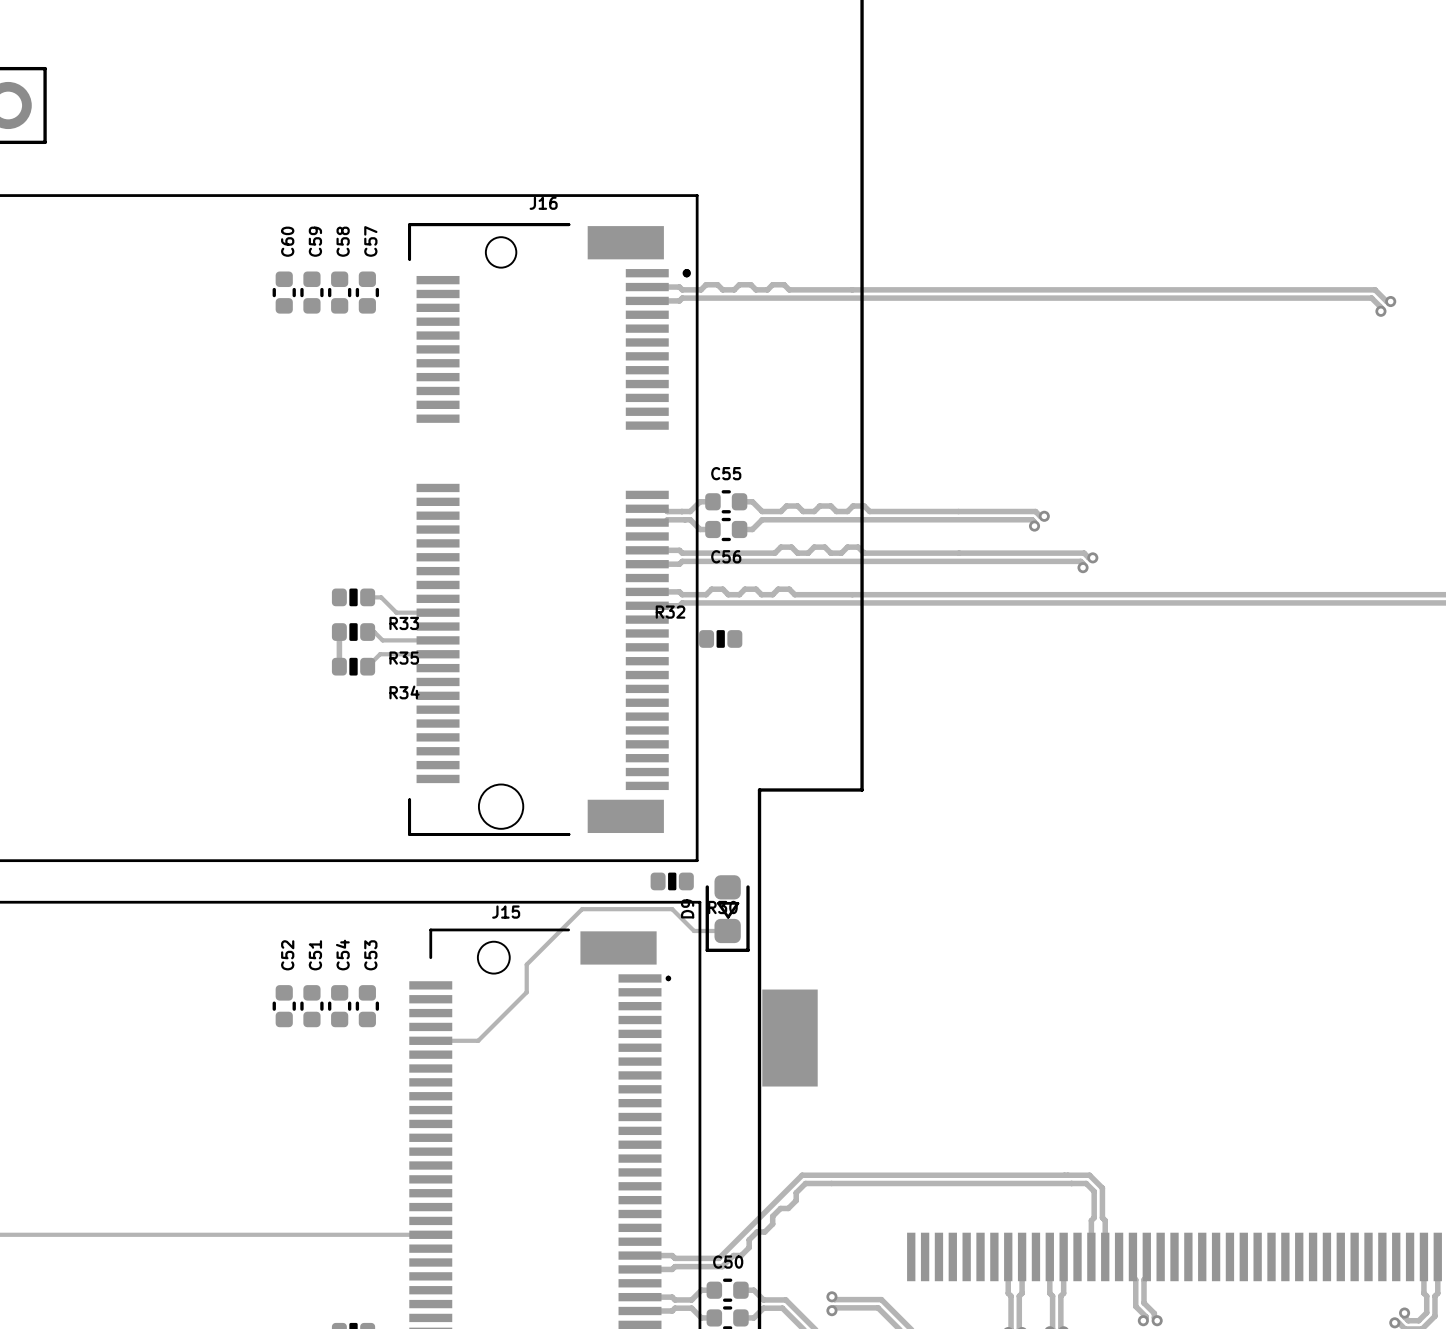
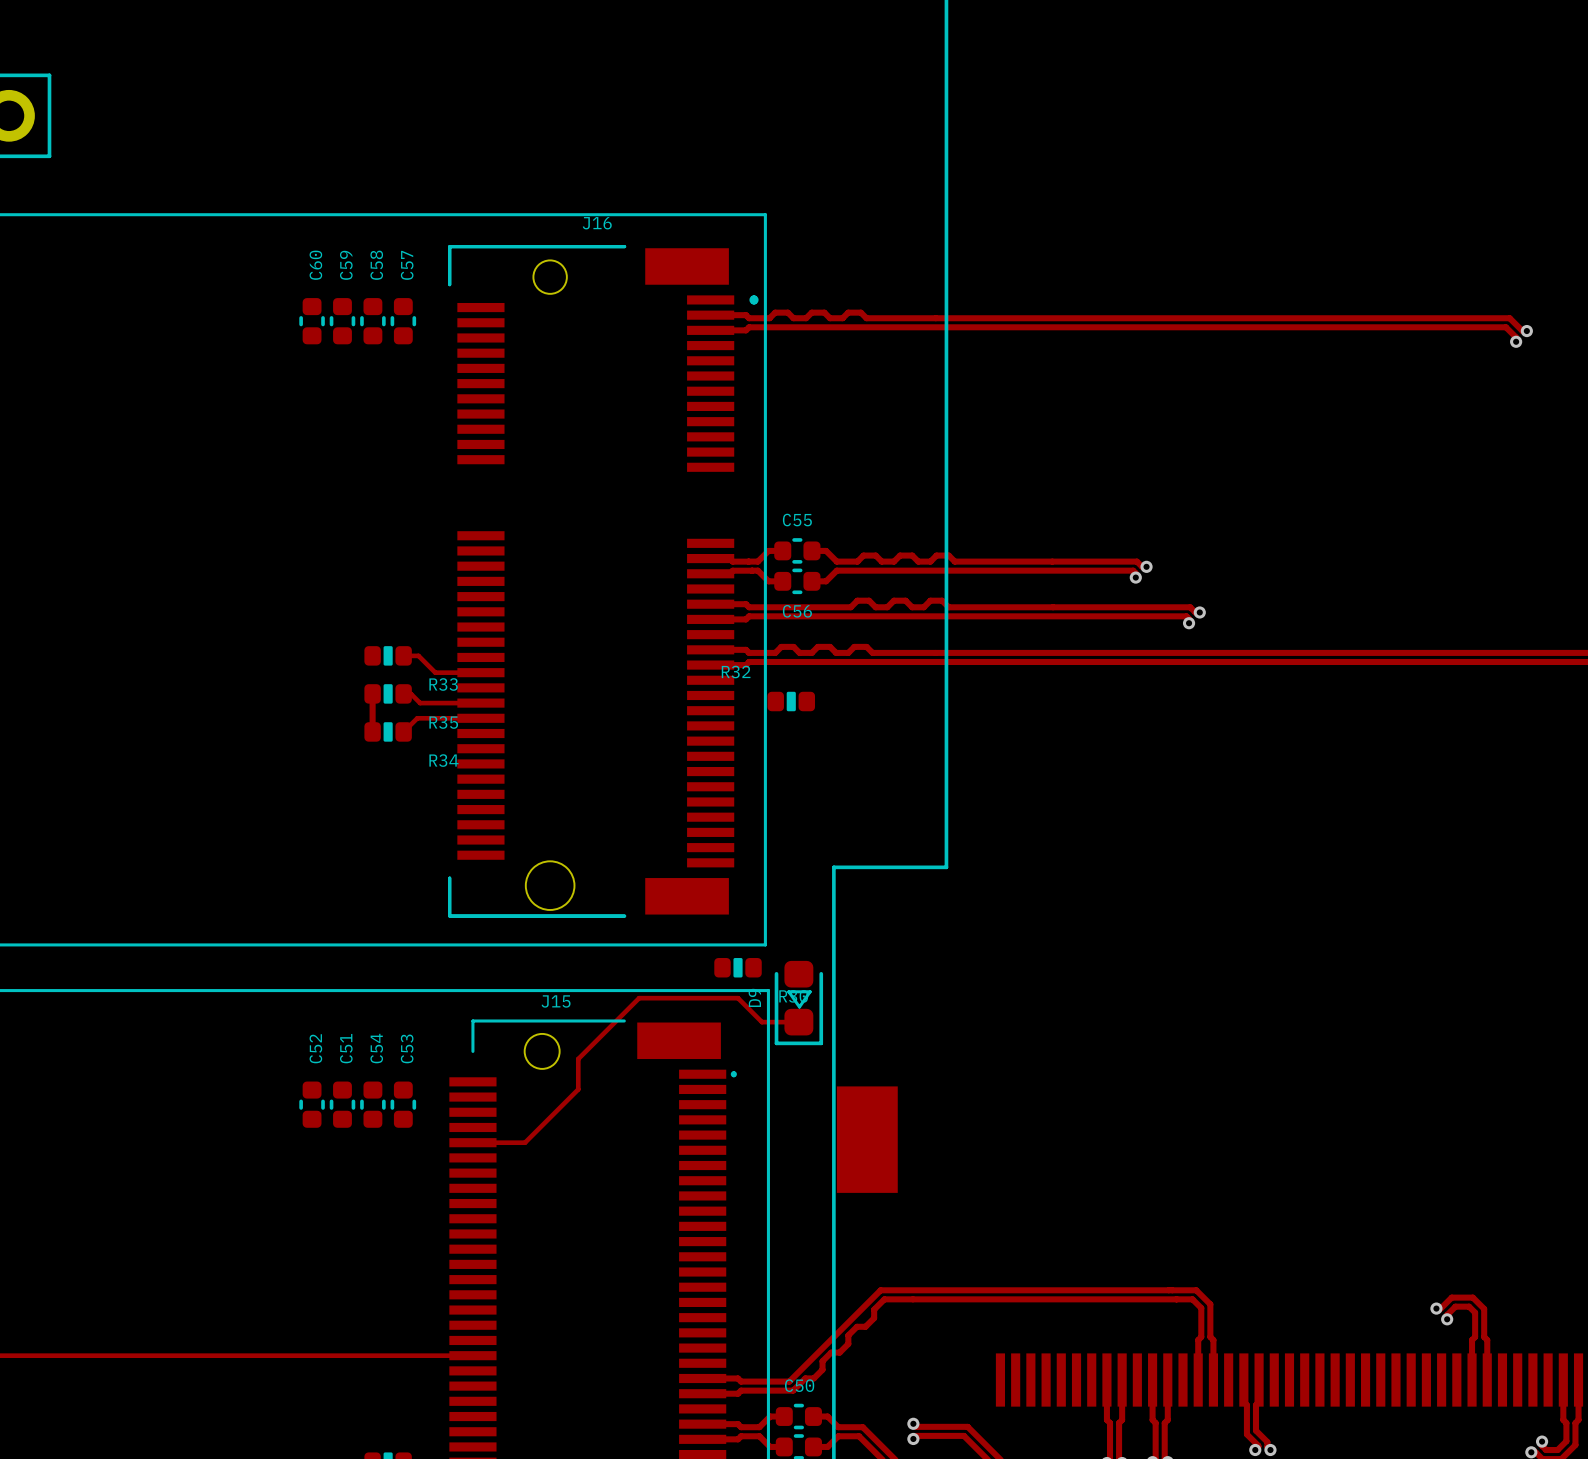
track: none -> (1436, 1308) (1440, 1308) (1451, 1297) (1472, 1297) (1484, 1308) (1484, 1337) (1487, 1340) (1487, 1380)
via: none -> (1436, 1308)
track: none -> (1447, 1319) (1447, 1314) (1455, 1306) (1469, 1306) (1475, 1312) (1475, 1337) (1472, 1340) (1472, 1380)
via: none -> (1447, 1319)

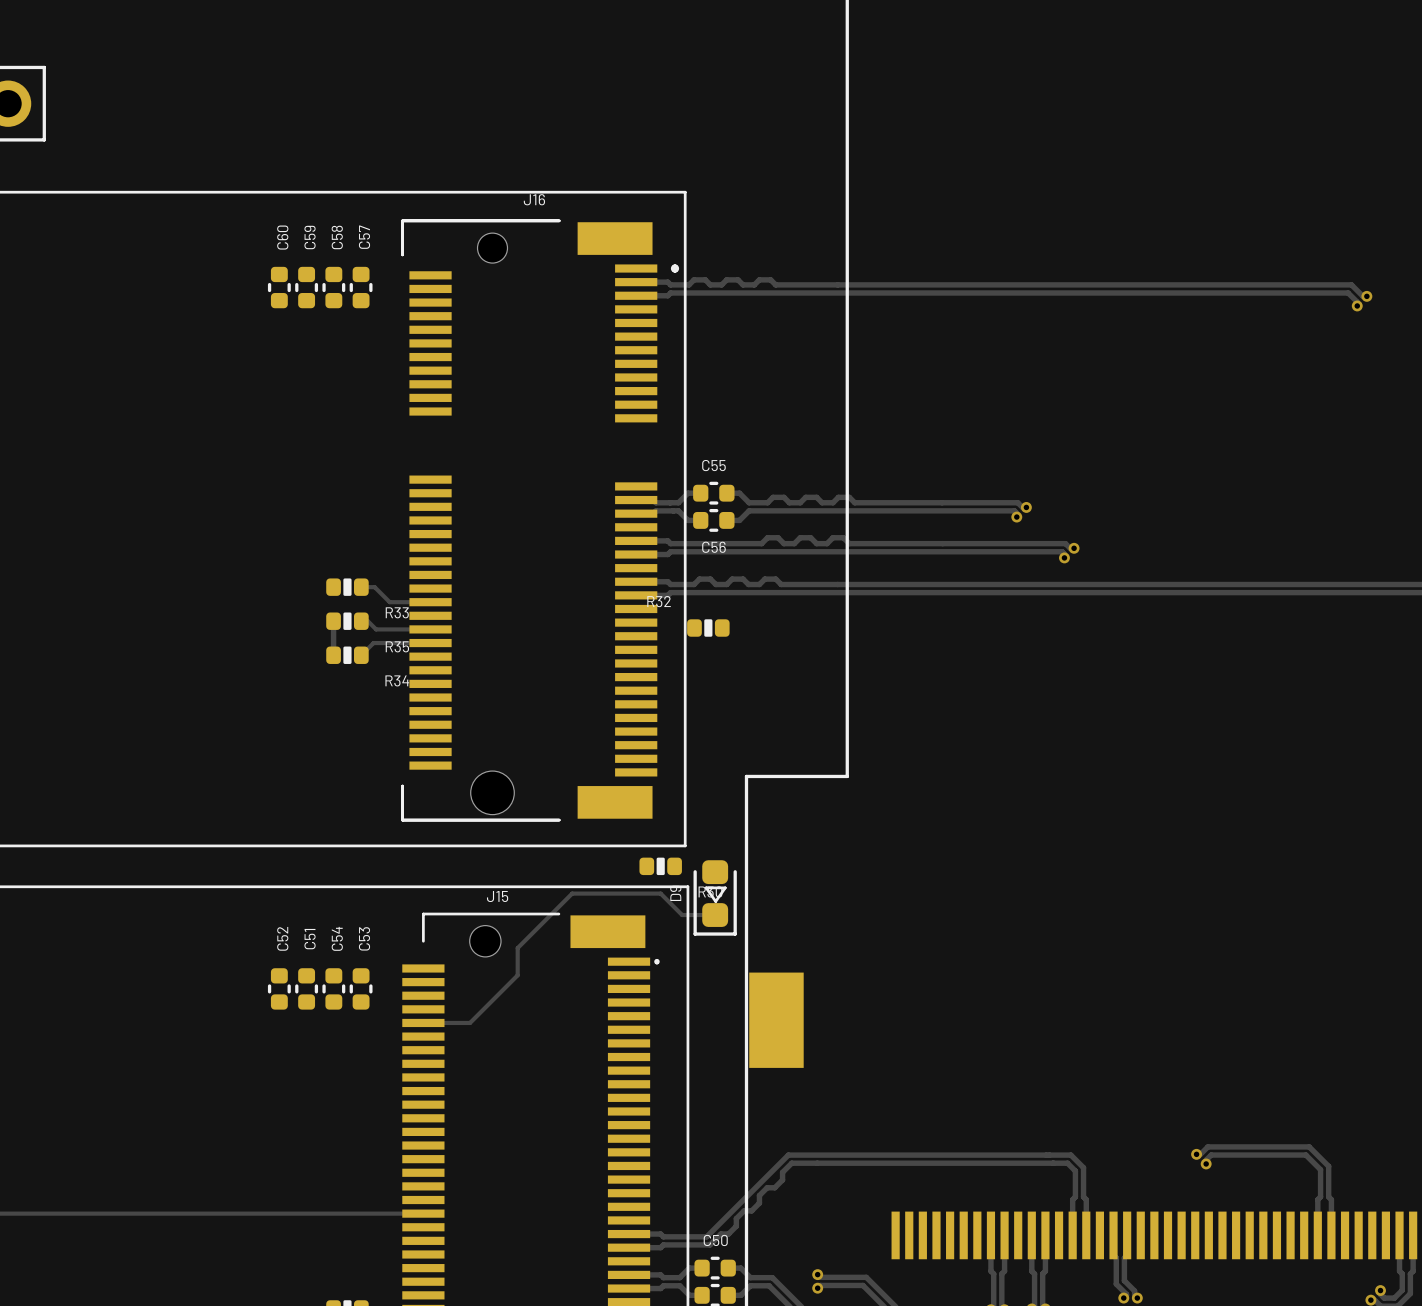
via: none -> (1196, 1154)
via: none -> (1206, 1163)
track: (1436, 1308) (1440, 1308) (1451, 1297) (1472, 1297) (1484, 1308) -> (1196, 1154) (1200, 1154) (1207, 1146) (1309, 1146) (1328, 1166) (1328, 1171)
via: (1436, 1308) -> none
track: (1475, 1312) (1469, 1306) (1455, 1306) (1447, 1314) (1447, 1319) -> (1320, 1175) (1320, 1169) (1305, 1155) (1211, 1155) (1206, 1160) (1206, 1163)
via: (1447, 1319) -> none

